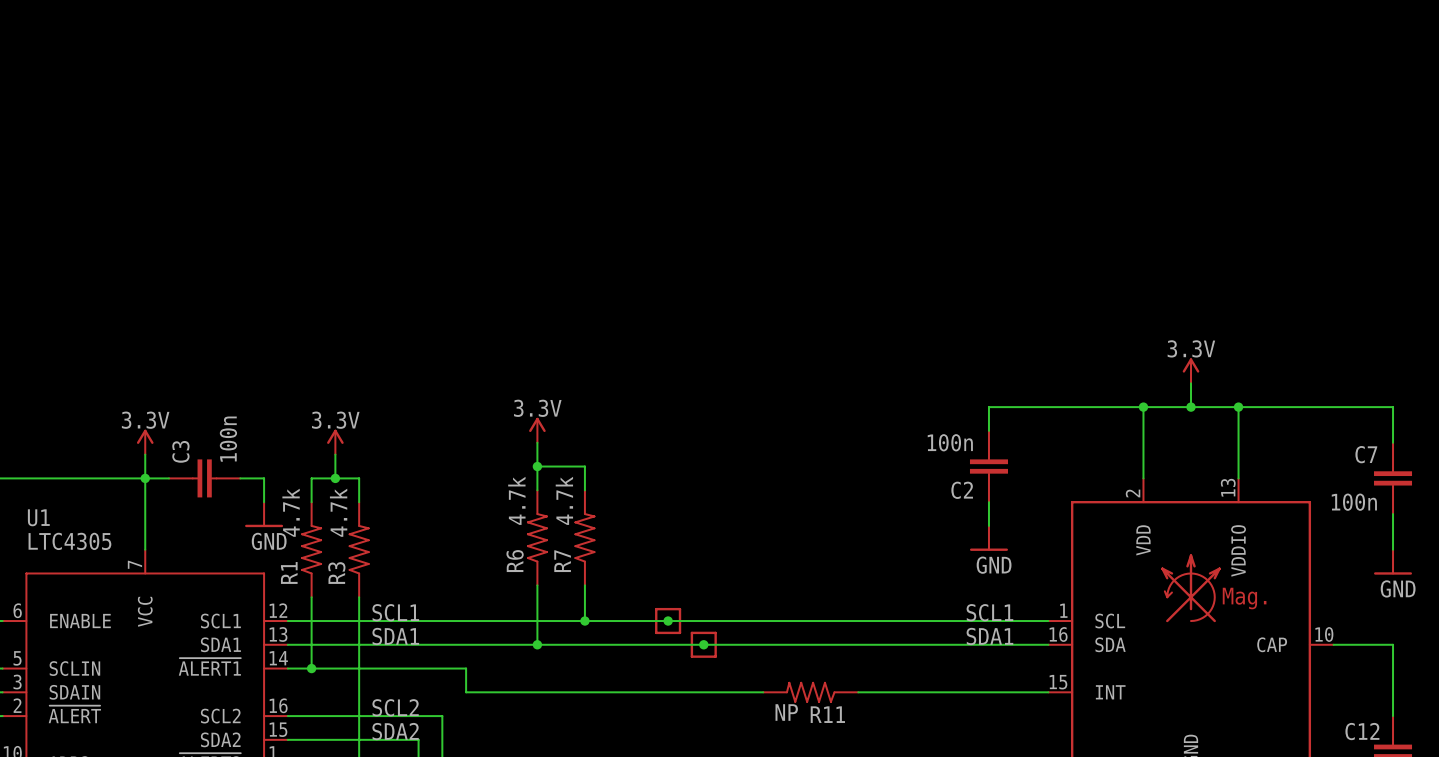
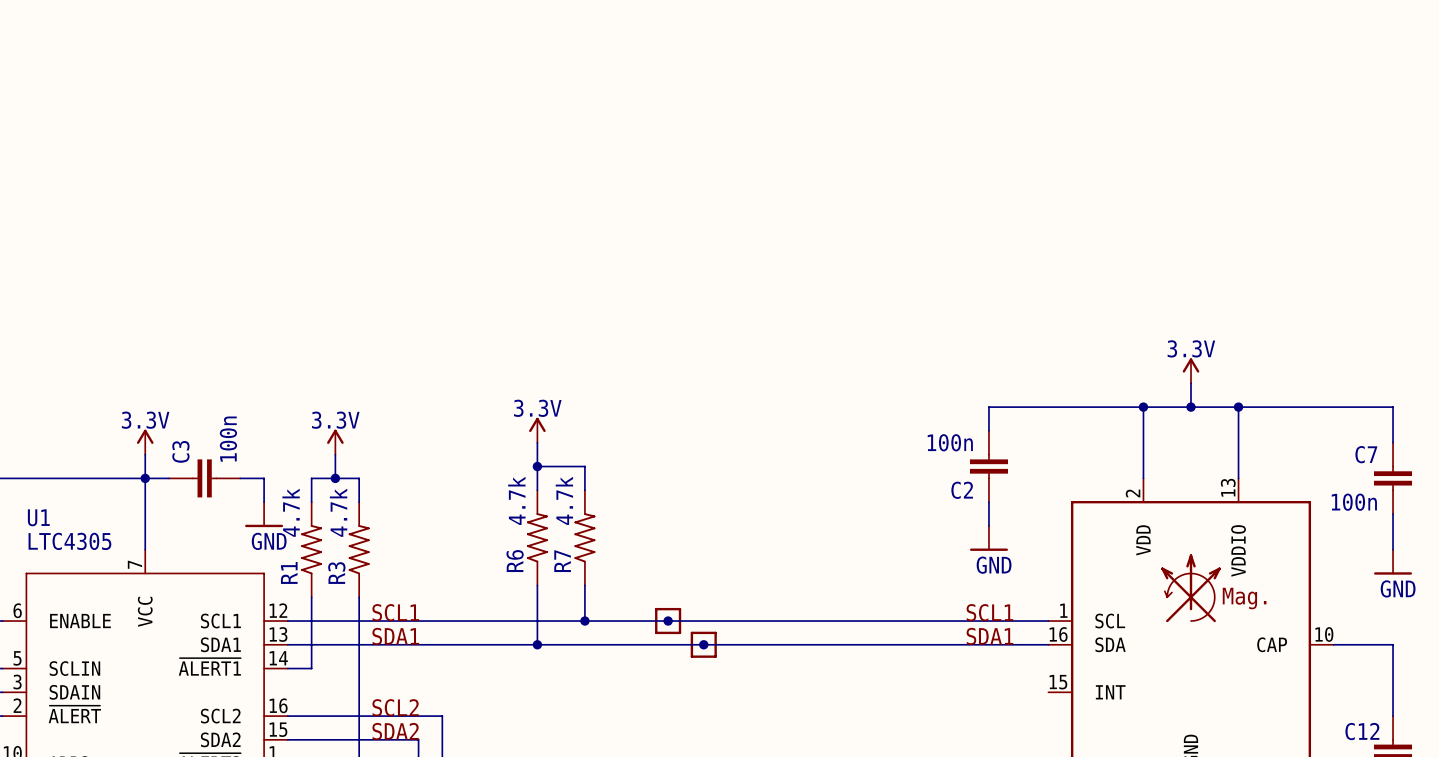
wire: (311, 668) (466, 668) (466, 692) (763, 692) -> none
junction: (311, 668) -> none
R11: NP (810, 692) -> none
wire: (858, 692) (1048, 692) -> none

